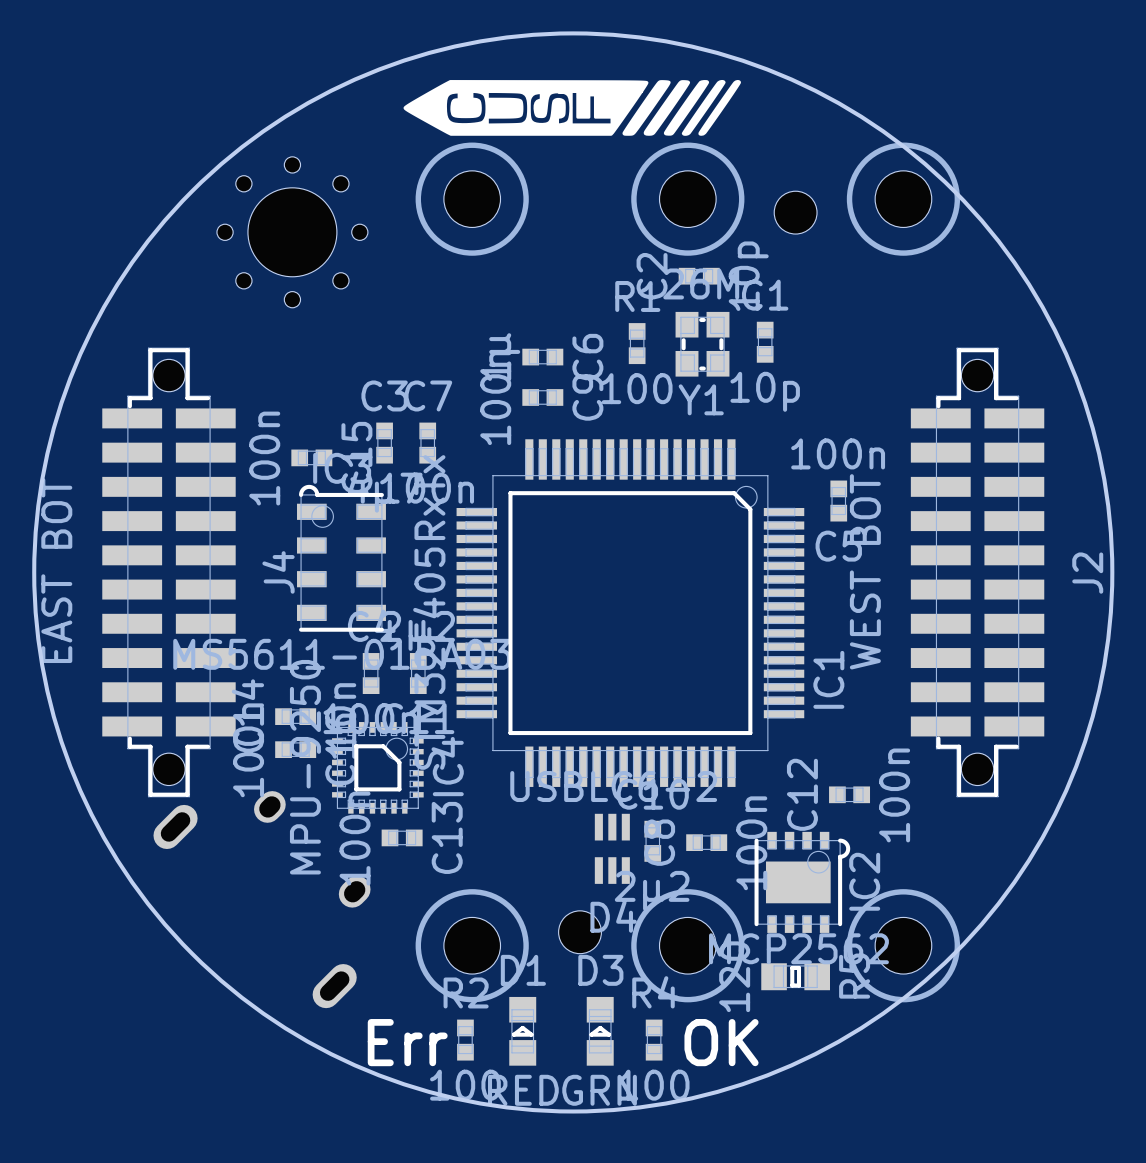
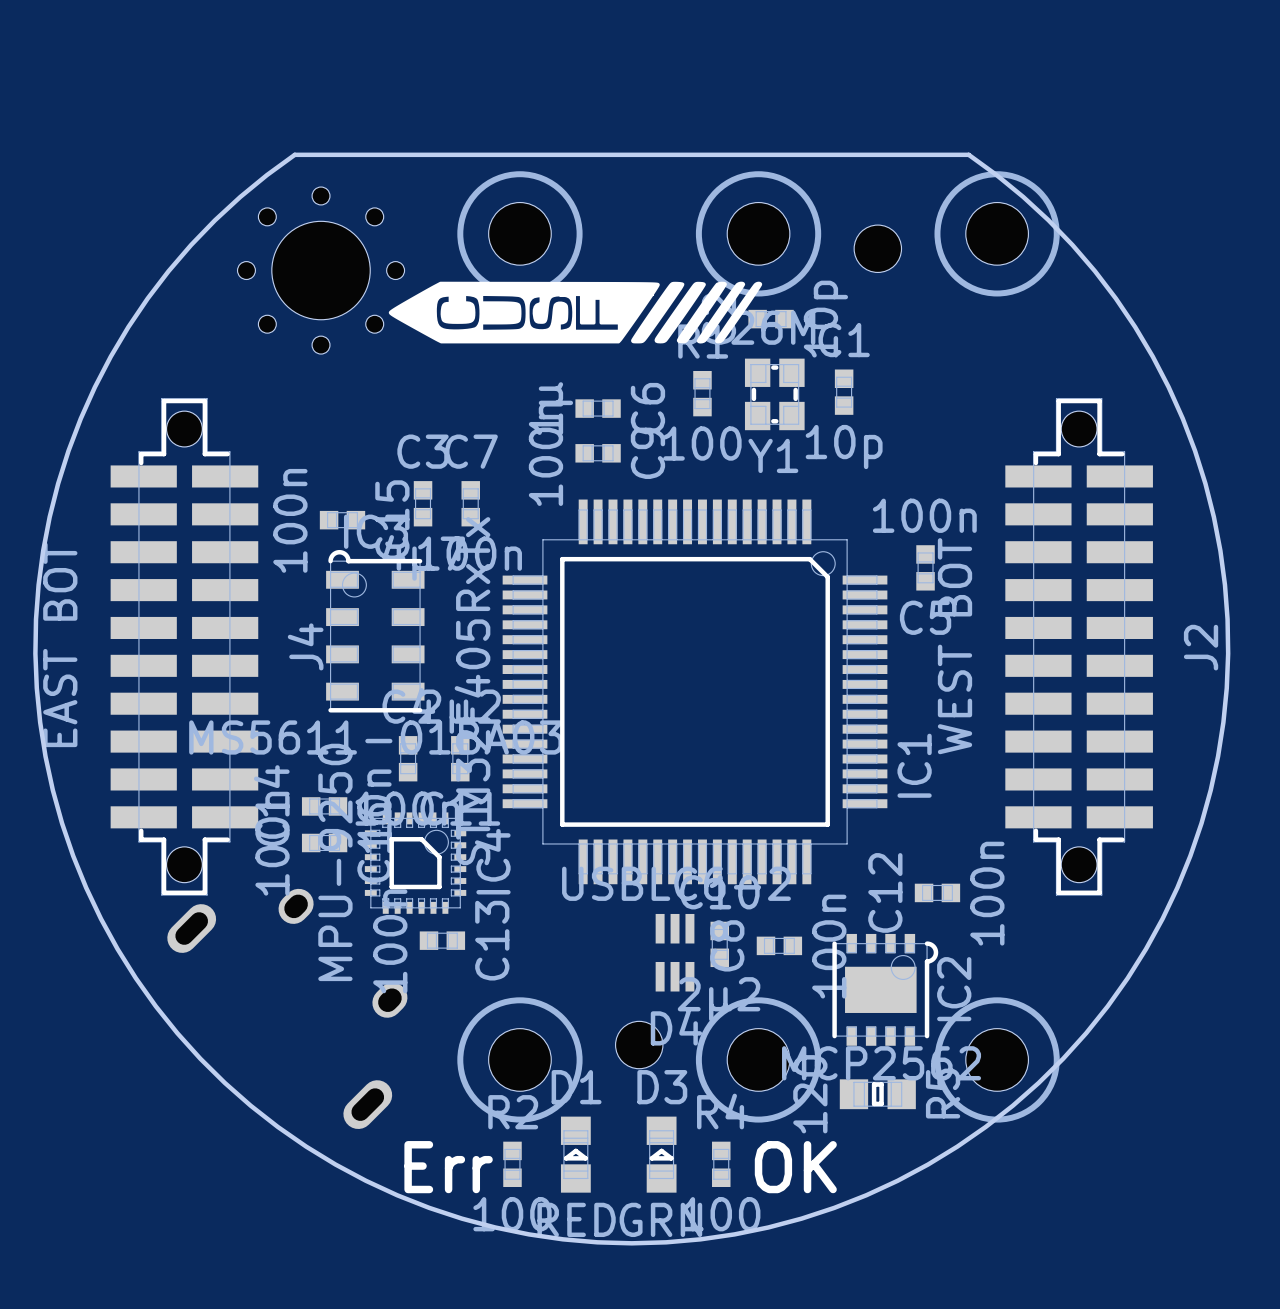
round board edge: [32, 31, 1115, 1114] -> none
drawing position: (572, 107) -> (575, 312)
board edge: none -> (294, 154) (968, 154) (1023, 196) (1048, 220) (1094, 271) (1135, 327) (1168, 387) (1195, 450) (1213, 517) (1220, 550) (1224, 584) (1228, 653) (1223, 722) (1210, 790) (1201, 823) (1177, 887) (1146, 949) (1127, 978) (1086, 1033) (1063, 1058) (1012, 1105) (957, 1146) (928, 1164) (866, 1195) (801, 1218) (734, 1234) (700, 1239) (631, 1243) (563, 1239) (495, 1227) (461, 1218) (397, 1195) (365, 1180) (306, 1146) (250, 1105) (224, 1082) (177, 1033) (135, 978) (117, 949) (86, 887) (62, 823) (45, 756) (36, 688) (36, 619) (43, 550) (49, 517) (68, 450) (94, 387) (110, 356) (147, 298) (168, 271) (215, 220) (240, 196) (294, 154)

